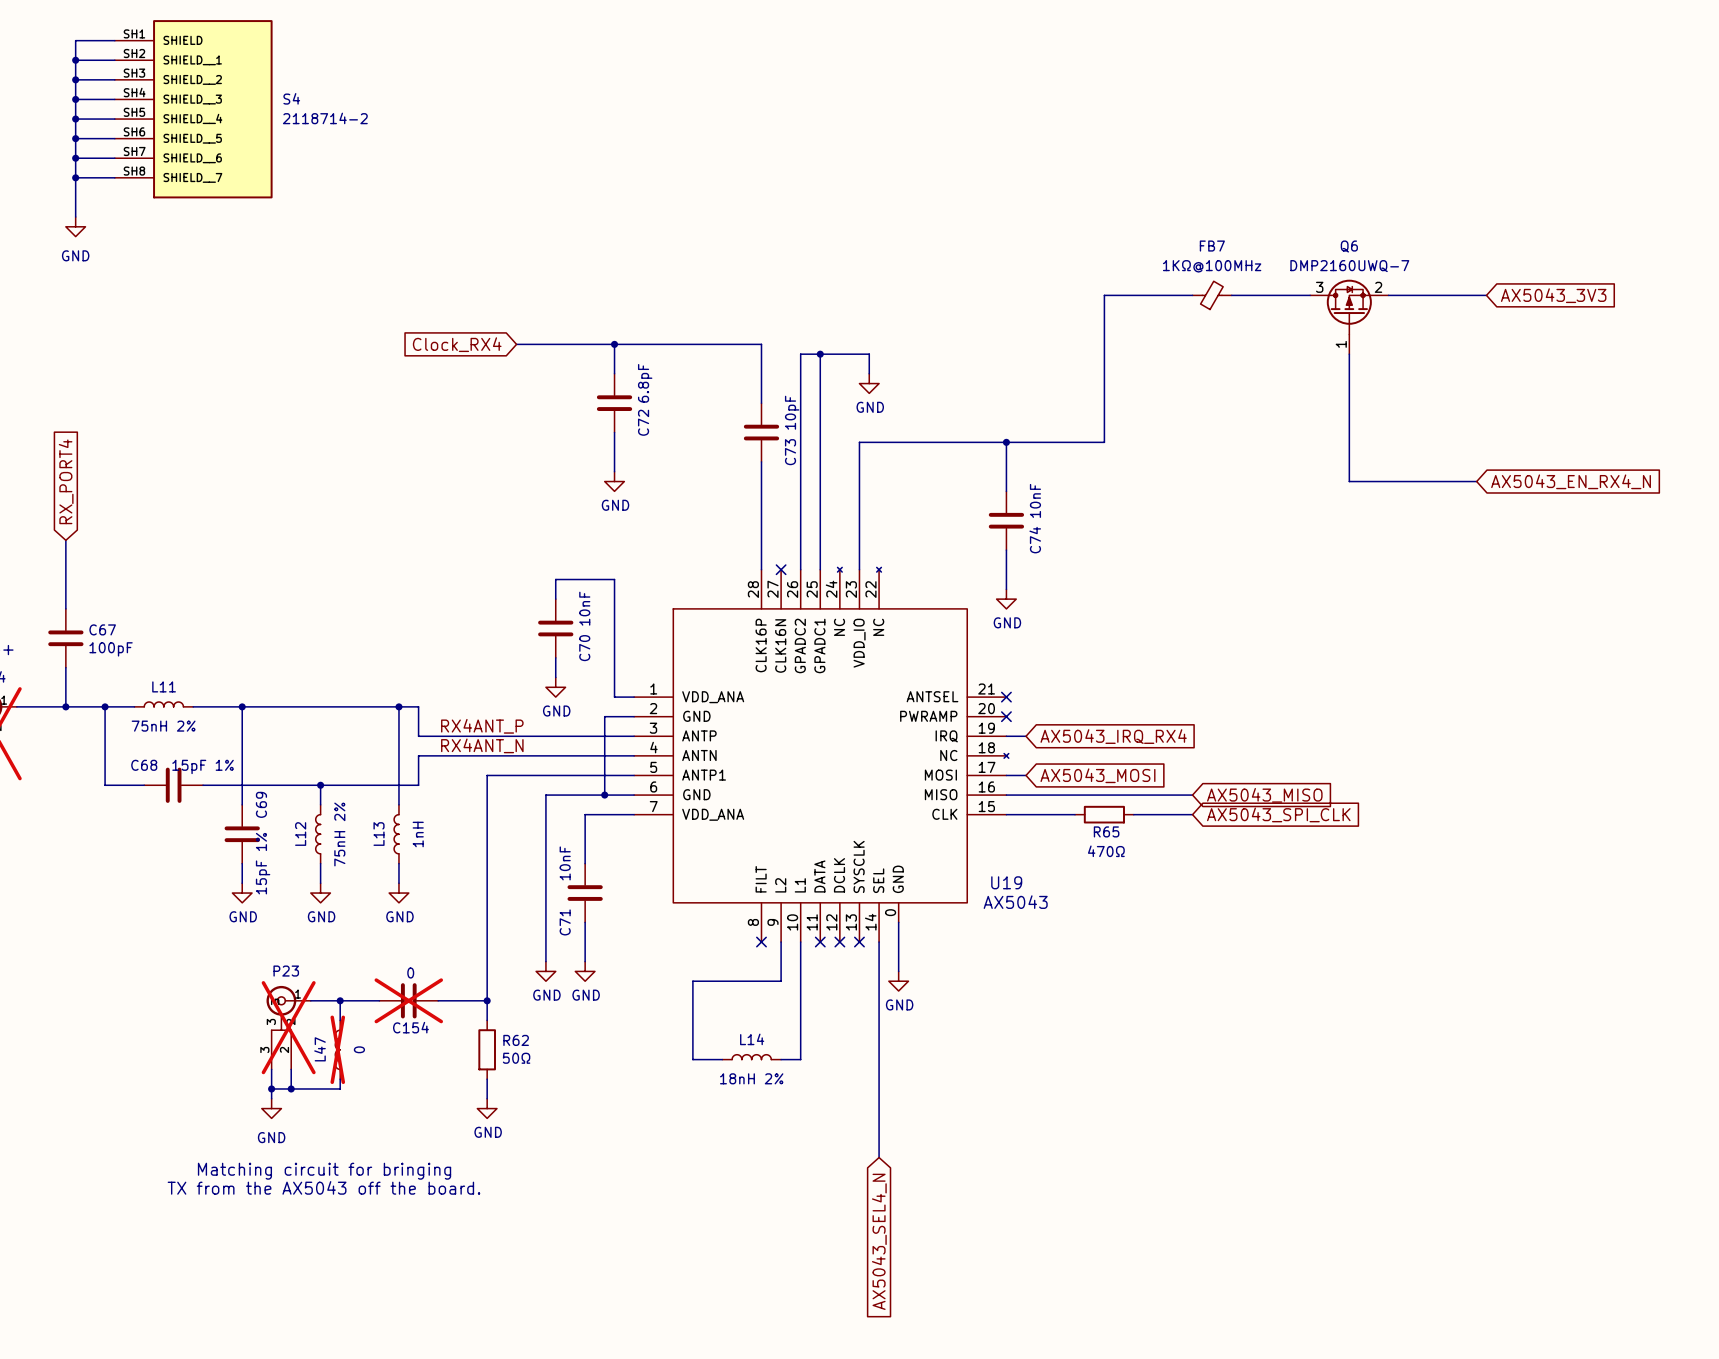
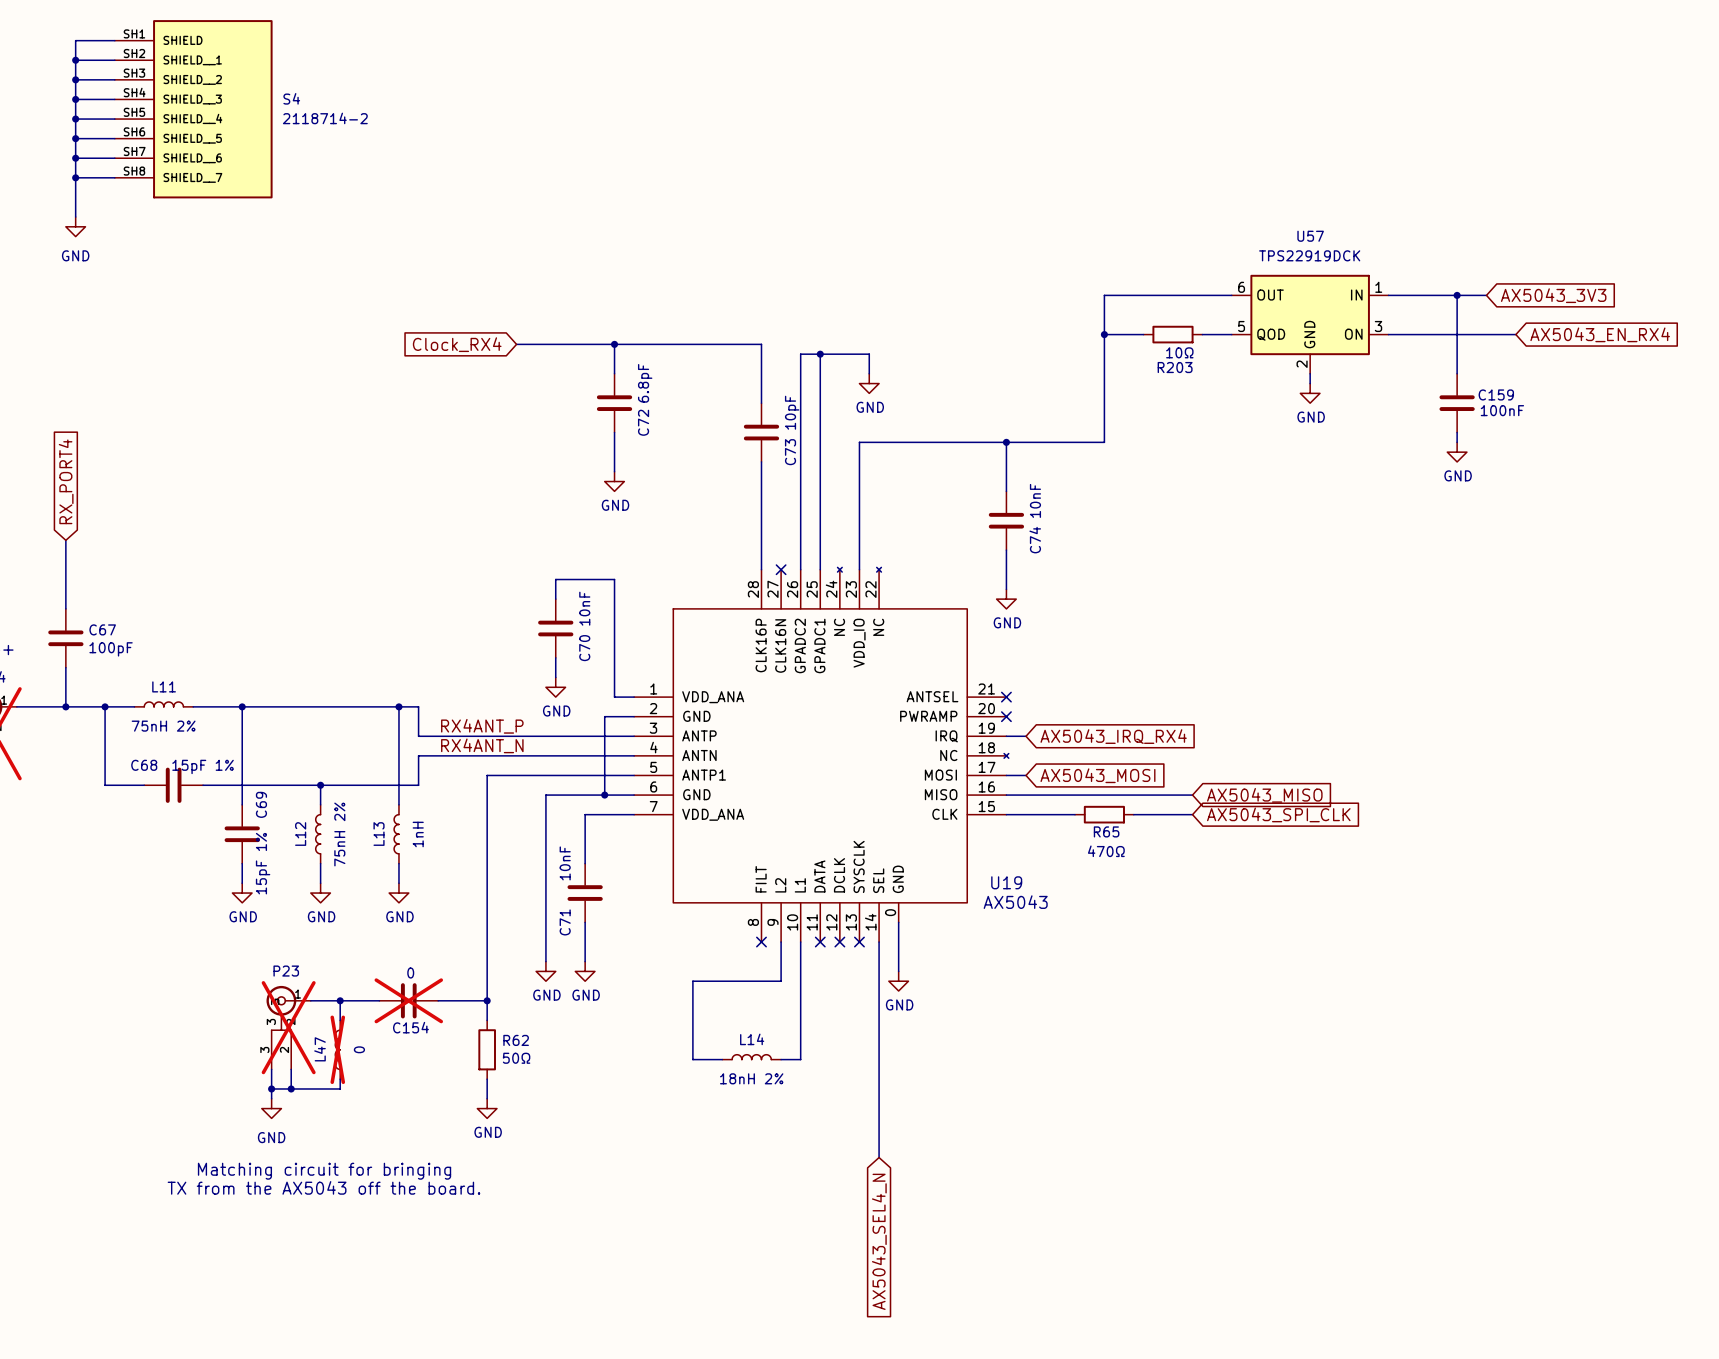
FB7: 1KΩ@100MHz (1212, 295) -> none
wire: none -> (1457, 295) (1457, 373)
junction: none -> (1457, 295)
Q6: DMP2160UWQ-7 (1349, 316) -> none
U57: none -> TPS22919DCK (1310, 324)
wire: none -> (1104, 334) (1143, 334)
junction: none -> (1104, 334)
R203: none -> 10Ω (1172, 334)
wire: none -> (1202, 334) (1231, 334)
wire: none -> (1388, 334) (1515, 334)
global label: none -> AX5043_EN_RX4 (1600, 334)
wire: (1349, 354) (1349, 481) (1476, 481) -> none
wire: none -> (1310, 373) (1310, 383)
power symbol: none -> GND (1310, 393)
C159: none -> 100nF (1457, 403)
wire: none -> (1457, 432) (1457, 442)
power symbol: none -> GND (1457, 452)
global label: AX5043_EN_RX4_N (1571, 481) -> none

